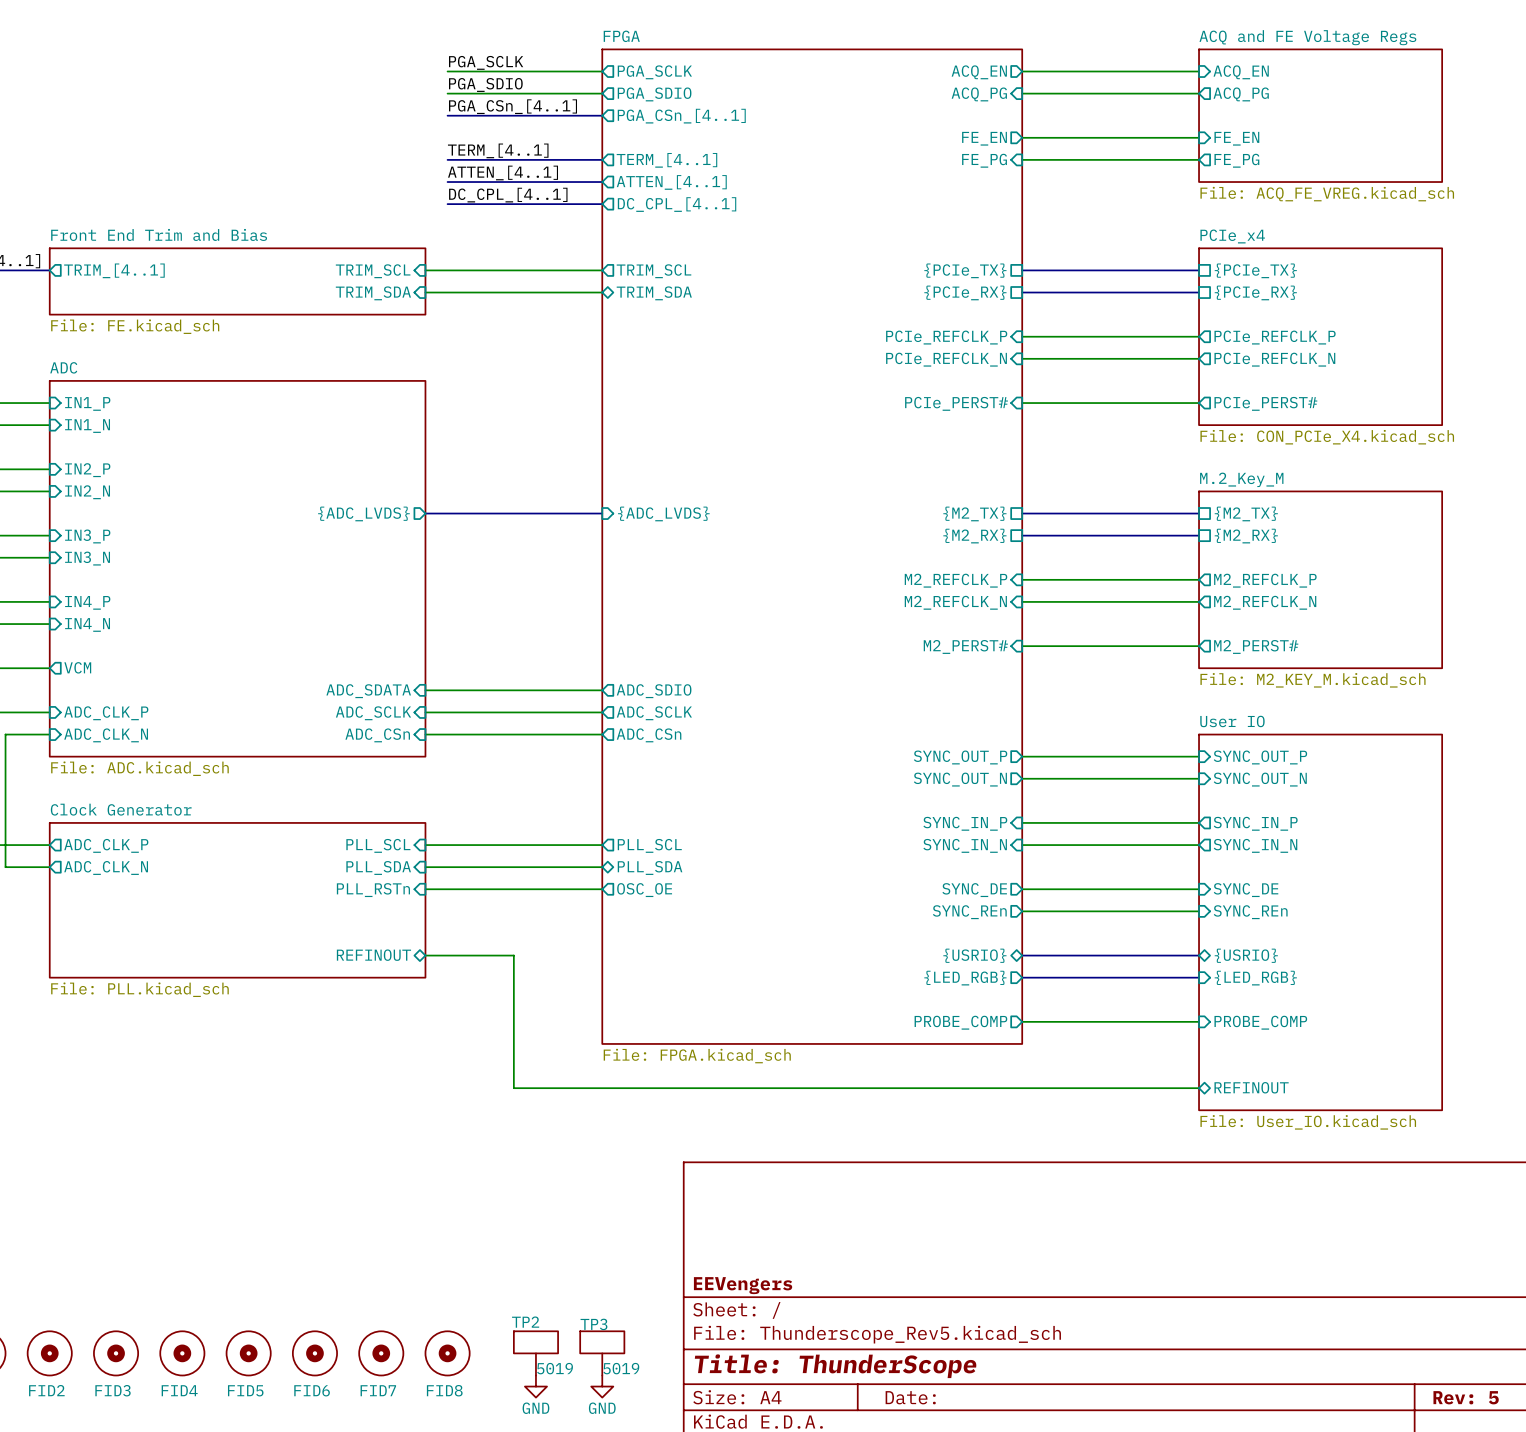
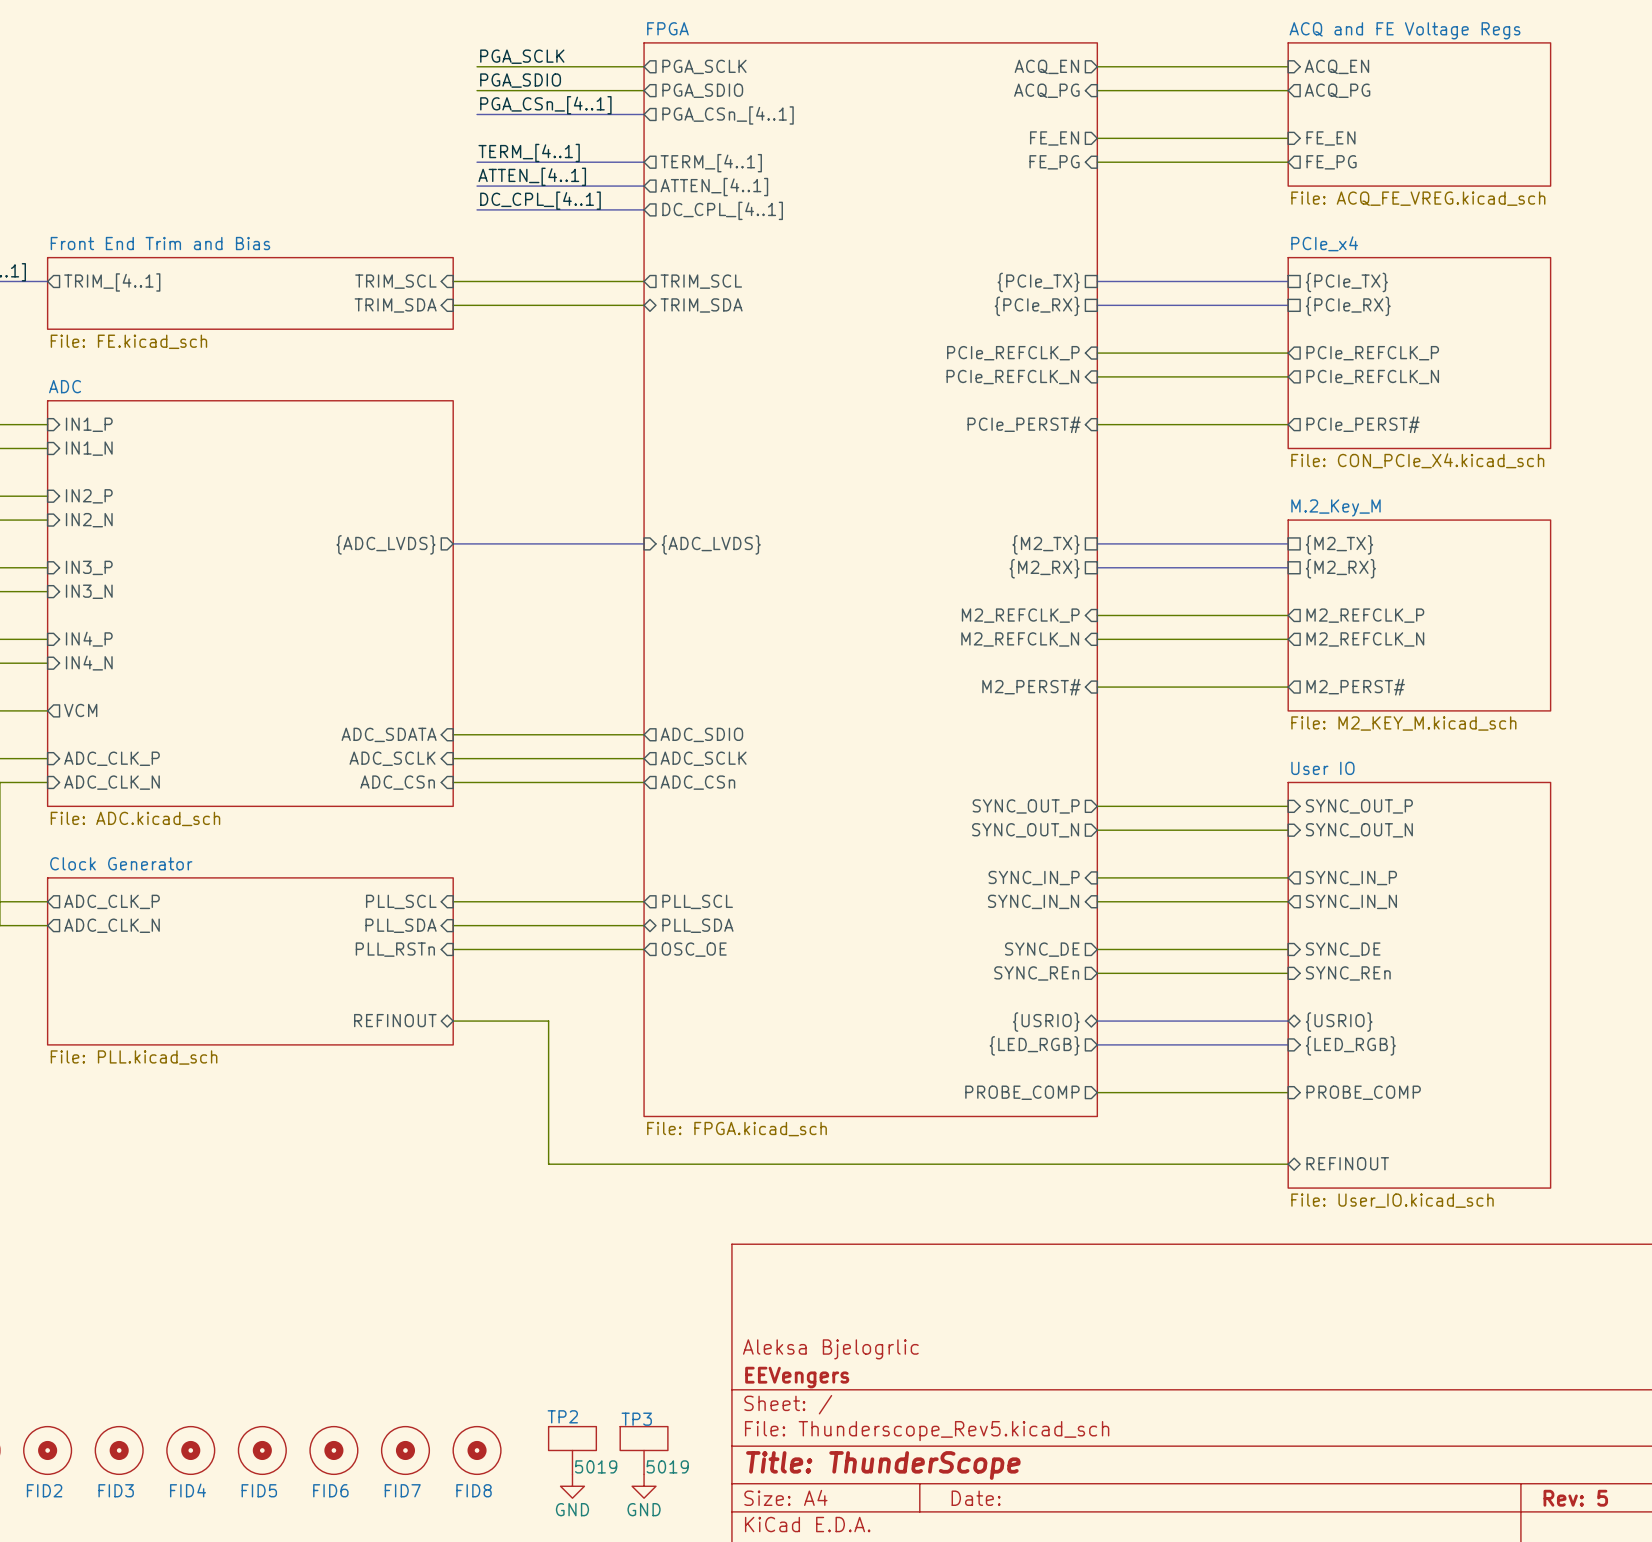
title block: none -> Aleksa Bjelogrlic (830, 1349)

